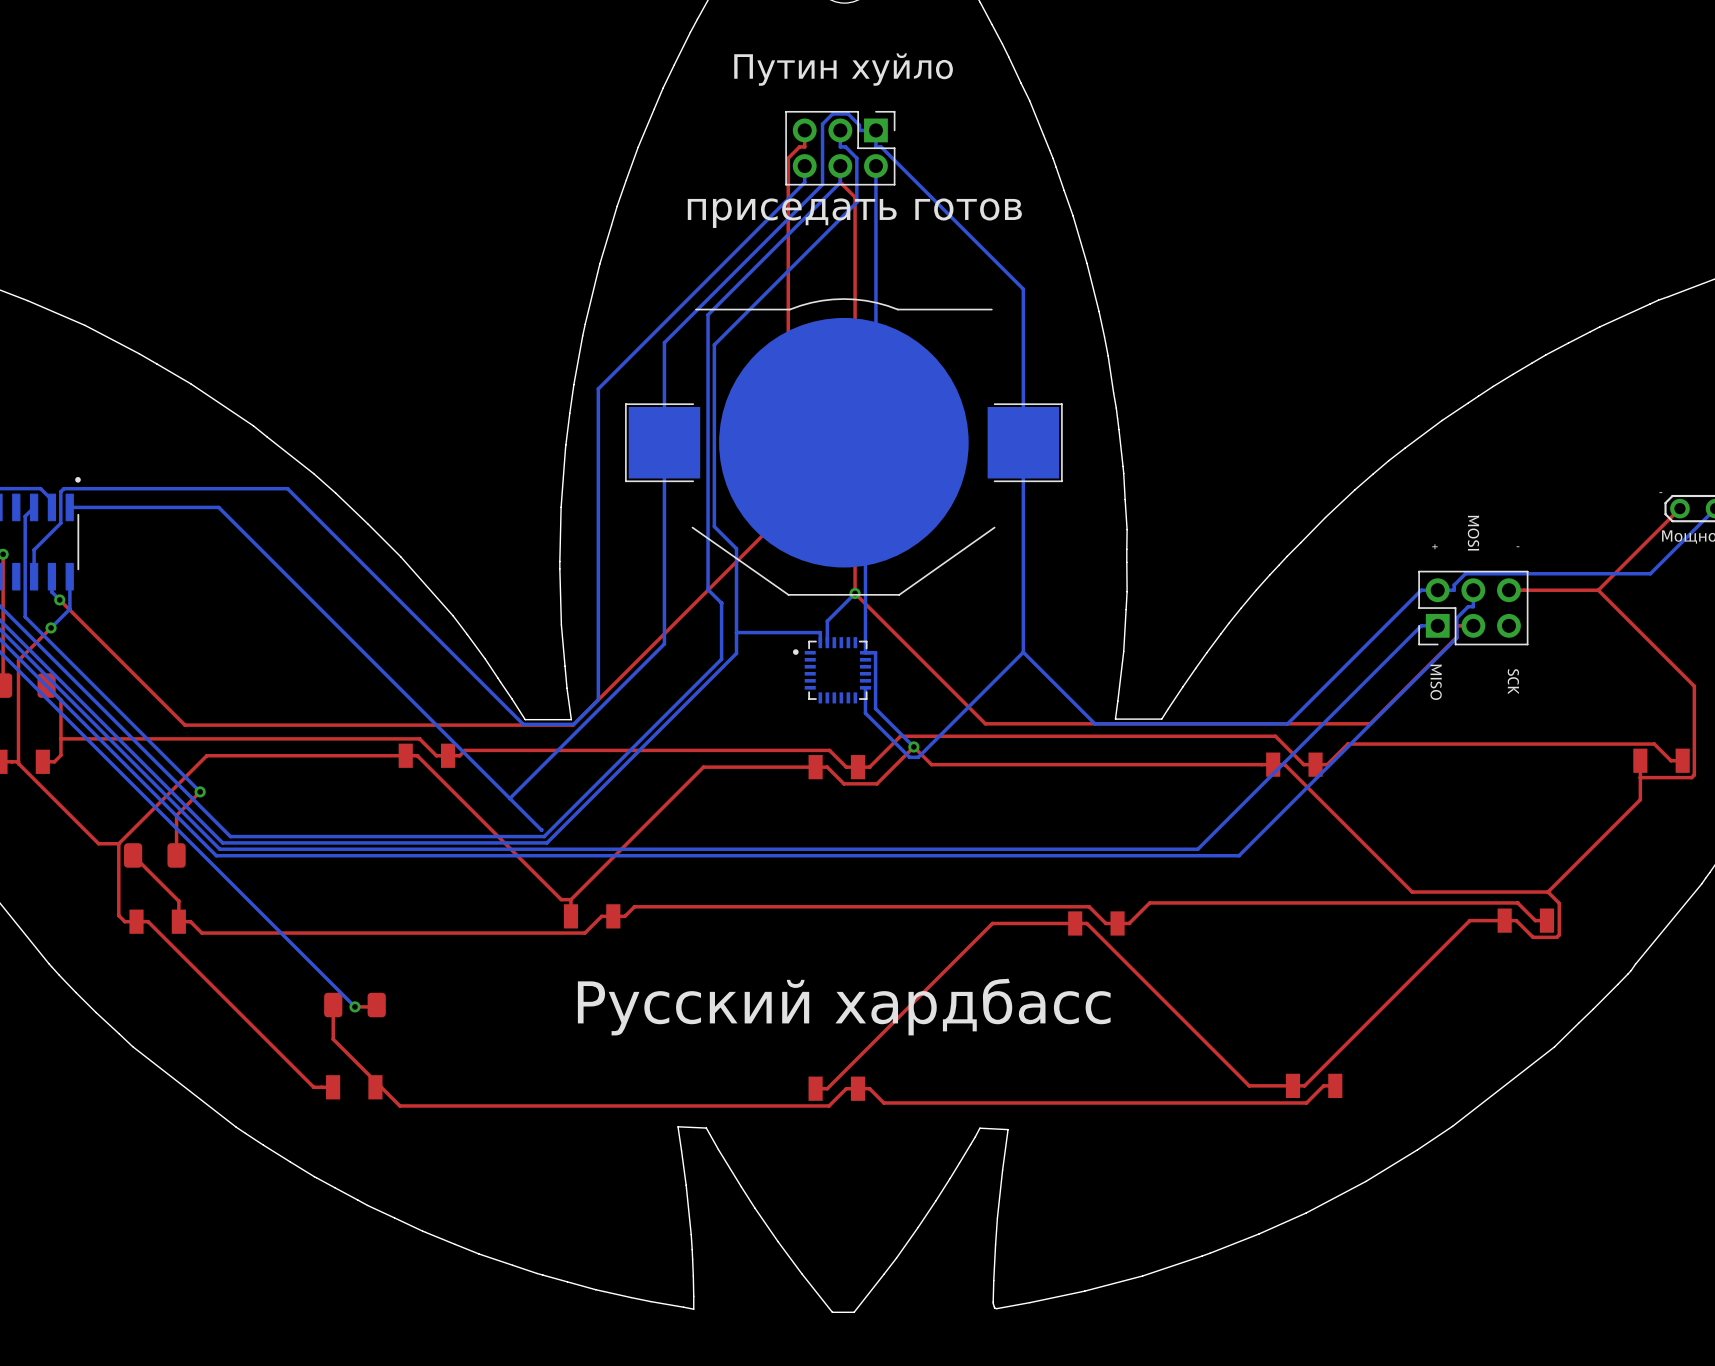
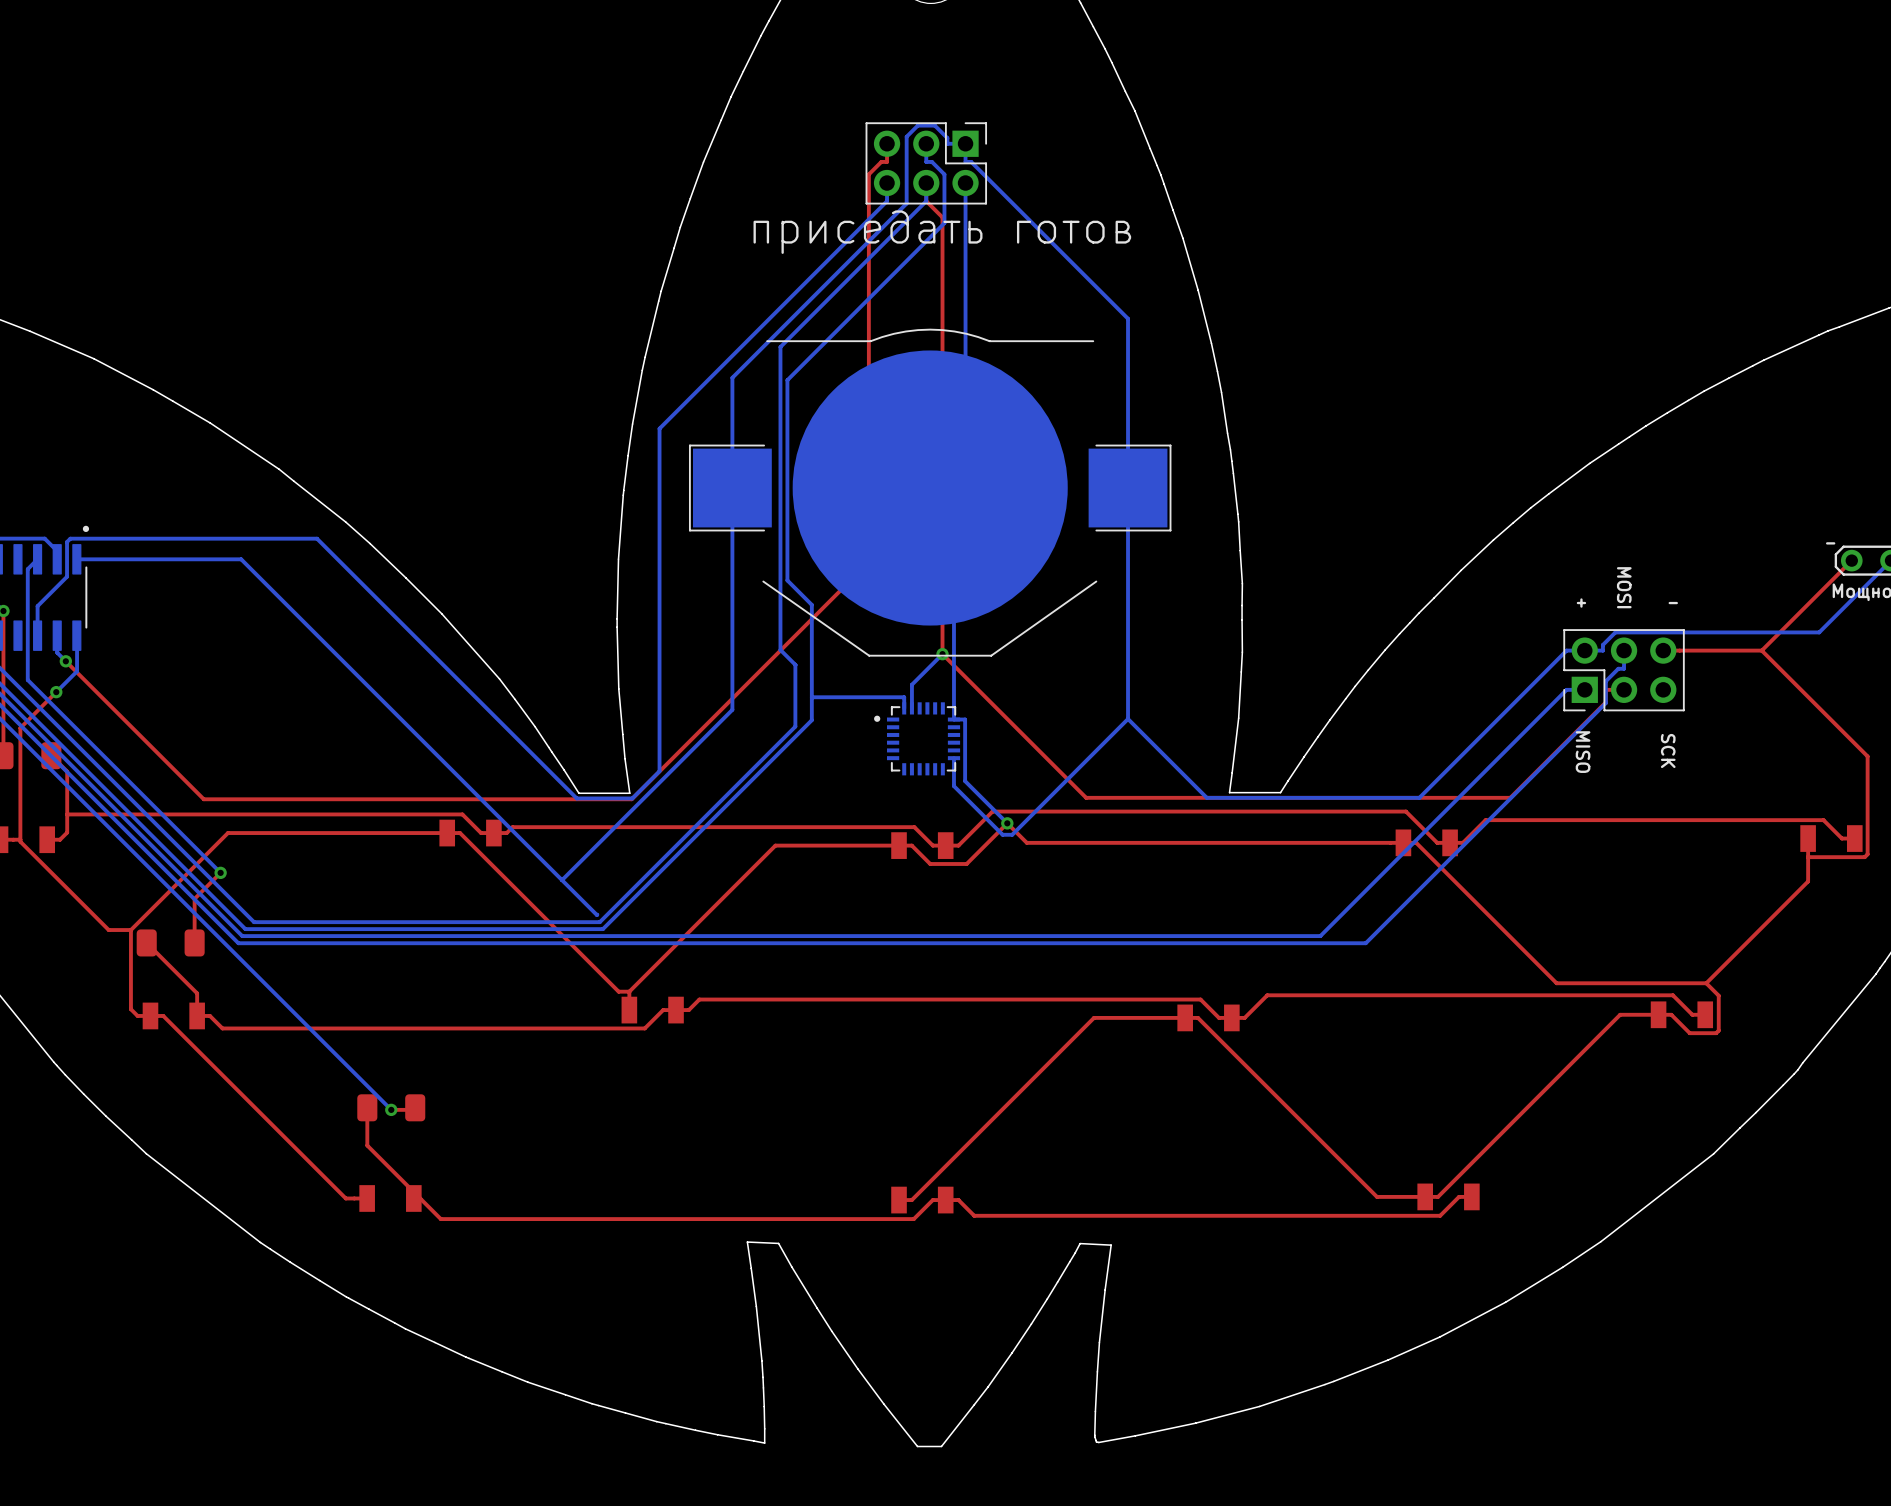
text: Путин хуйло (843, 69) -> none
text: Русский хардбасс (844, 1007) -> none

